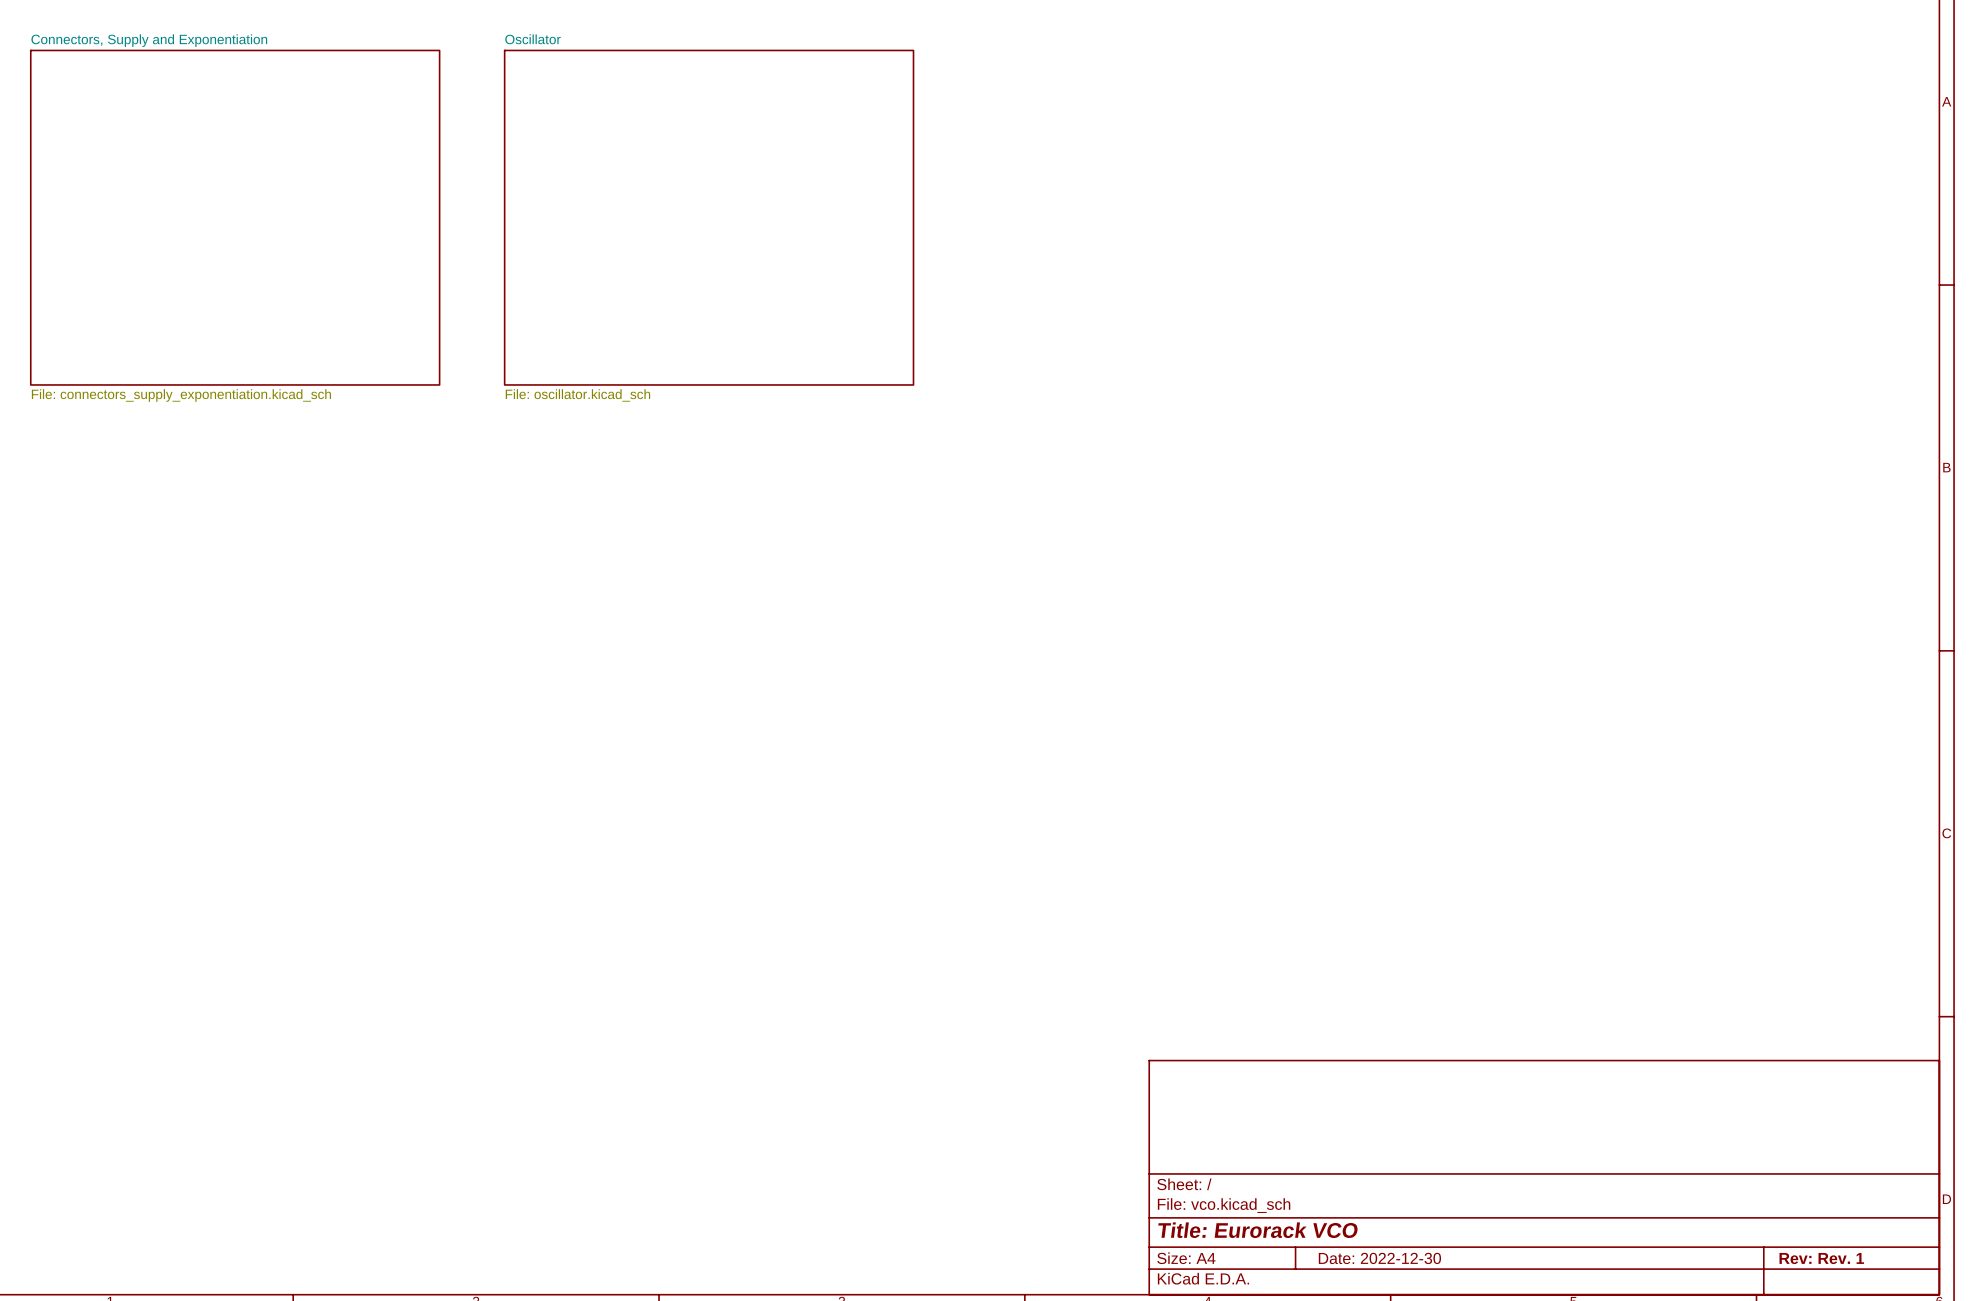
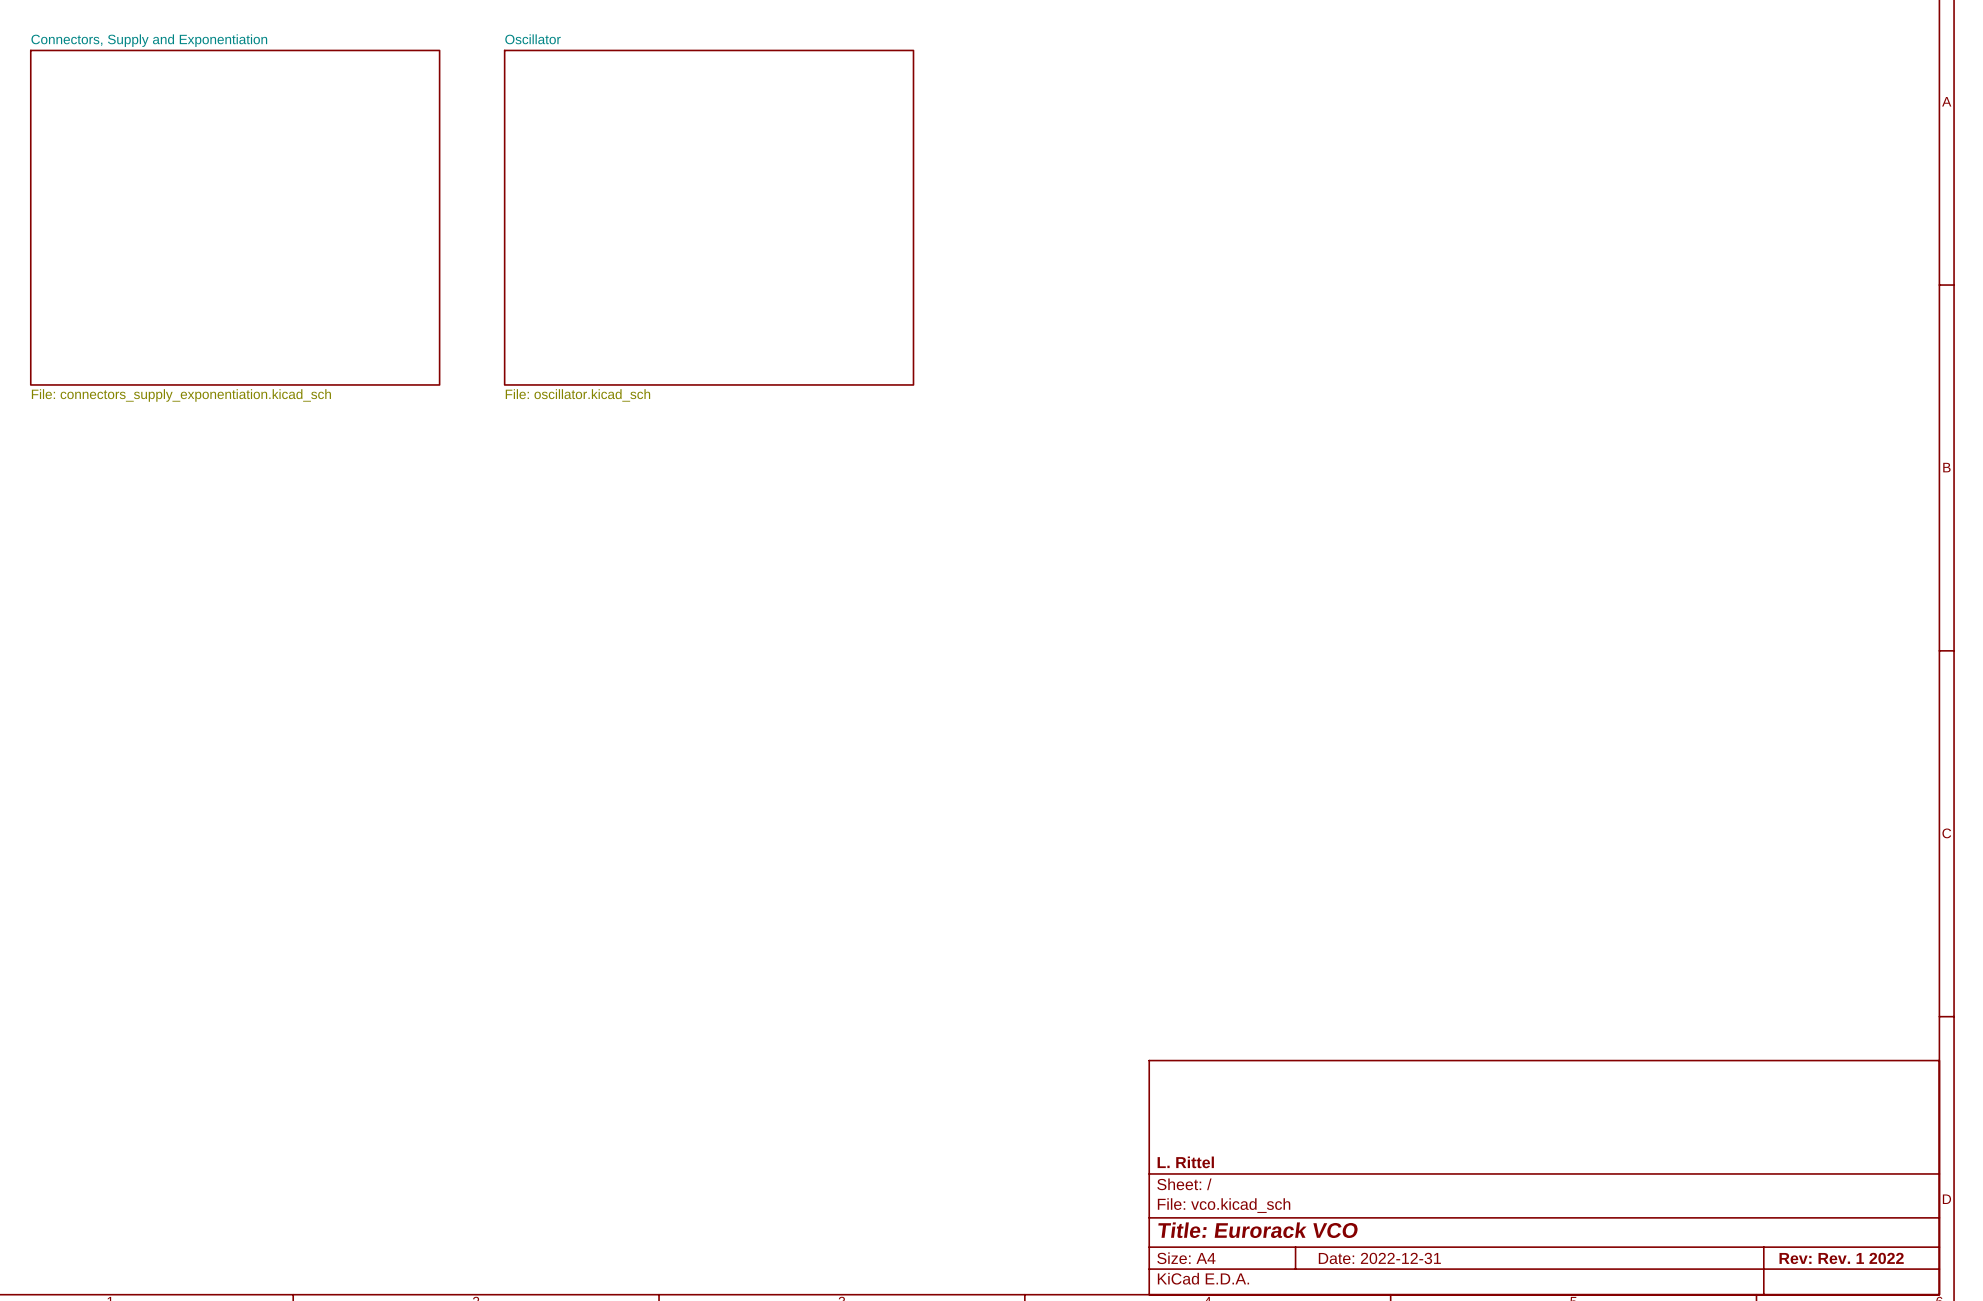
title block: none -> L. Rittel (1185, 1162)
title block: Date: 2022-12-30 (1379, 1258) -> Date: 2022-12-31 (1379, 1258)
title block: Rev: Rev. 1 (1821, 1258) -> Rev: Rev. 1 2022 (1841, 1258)

